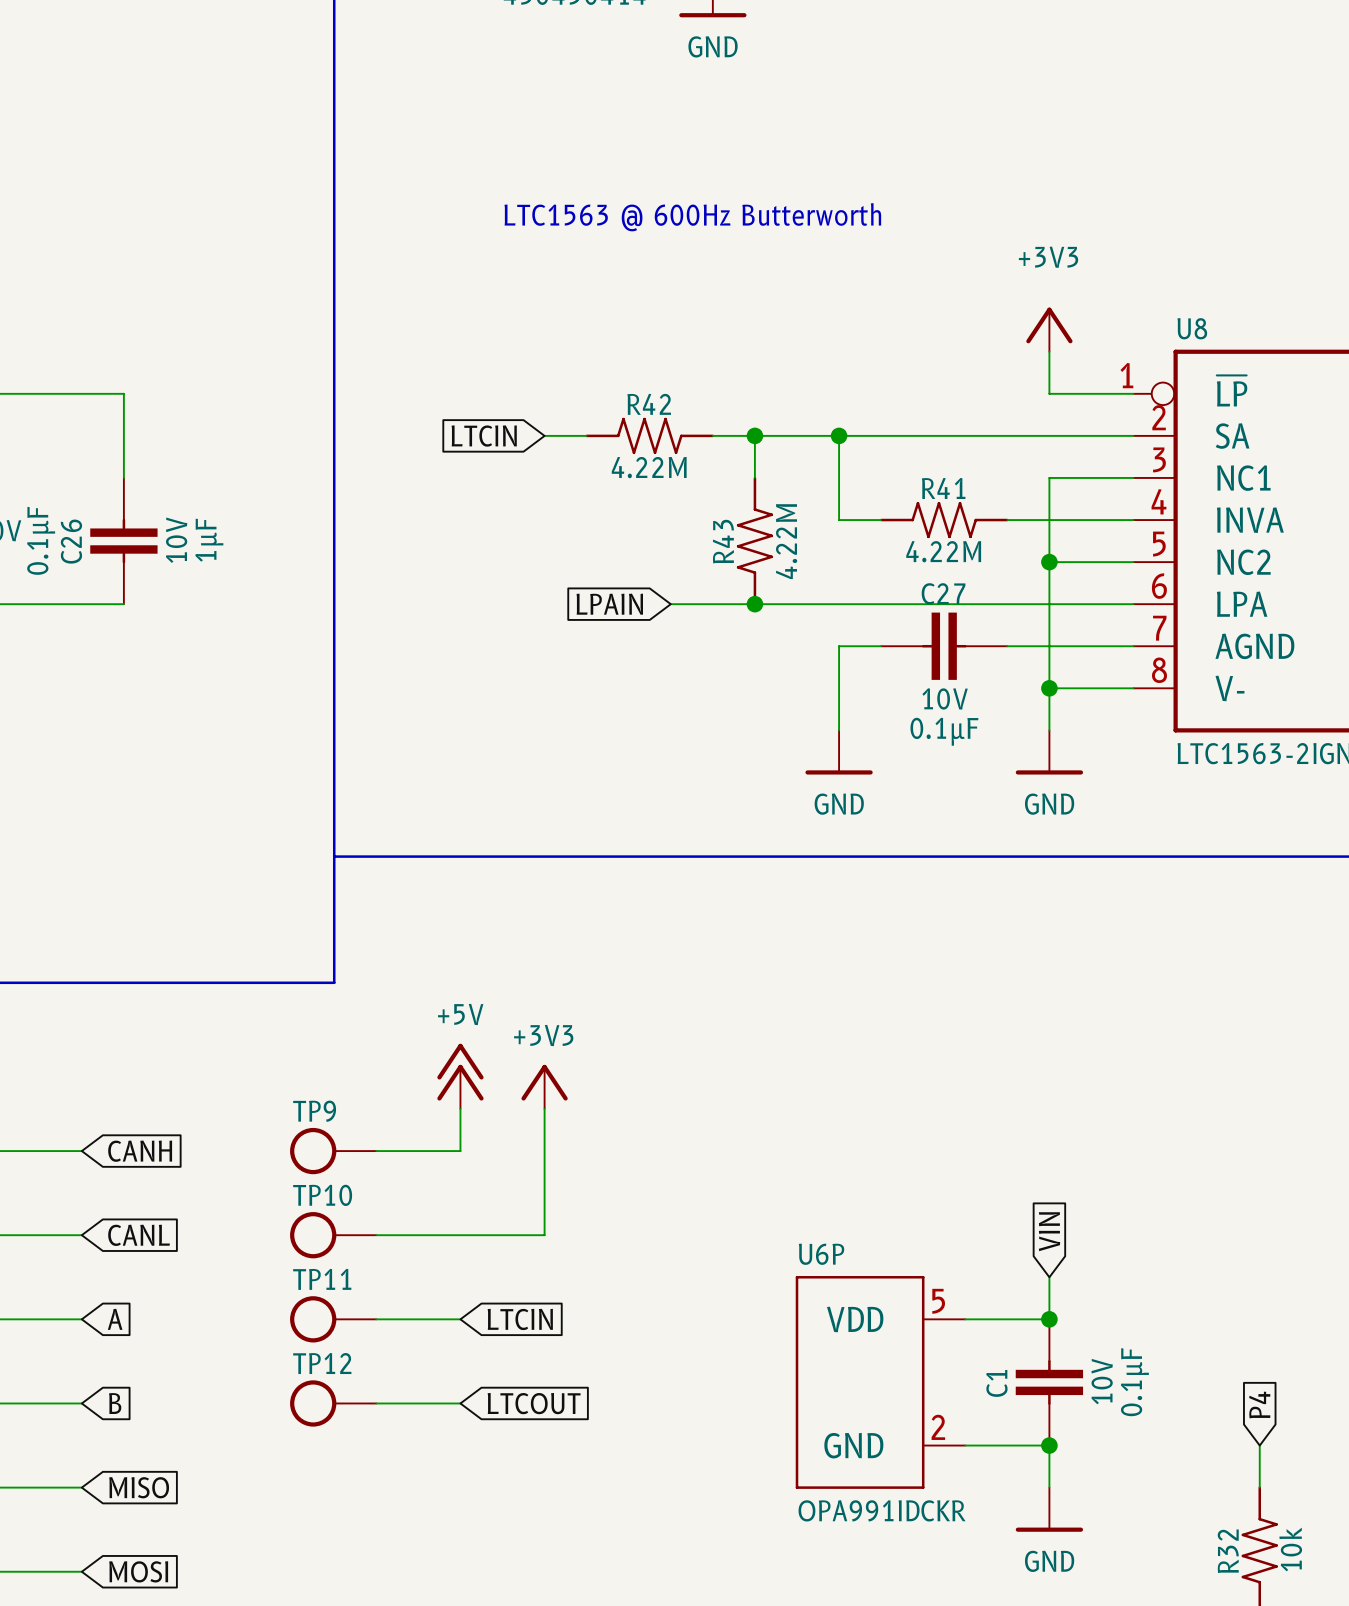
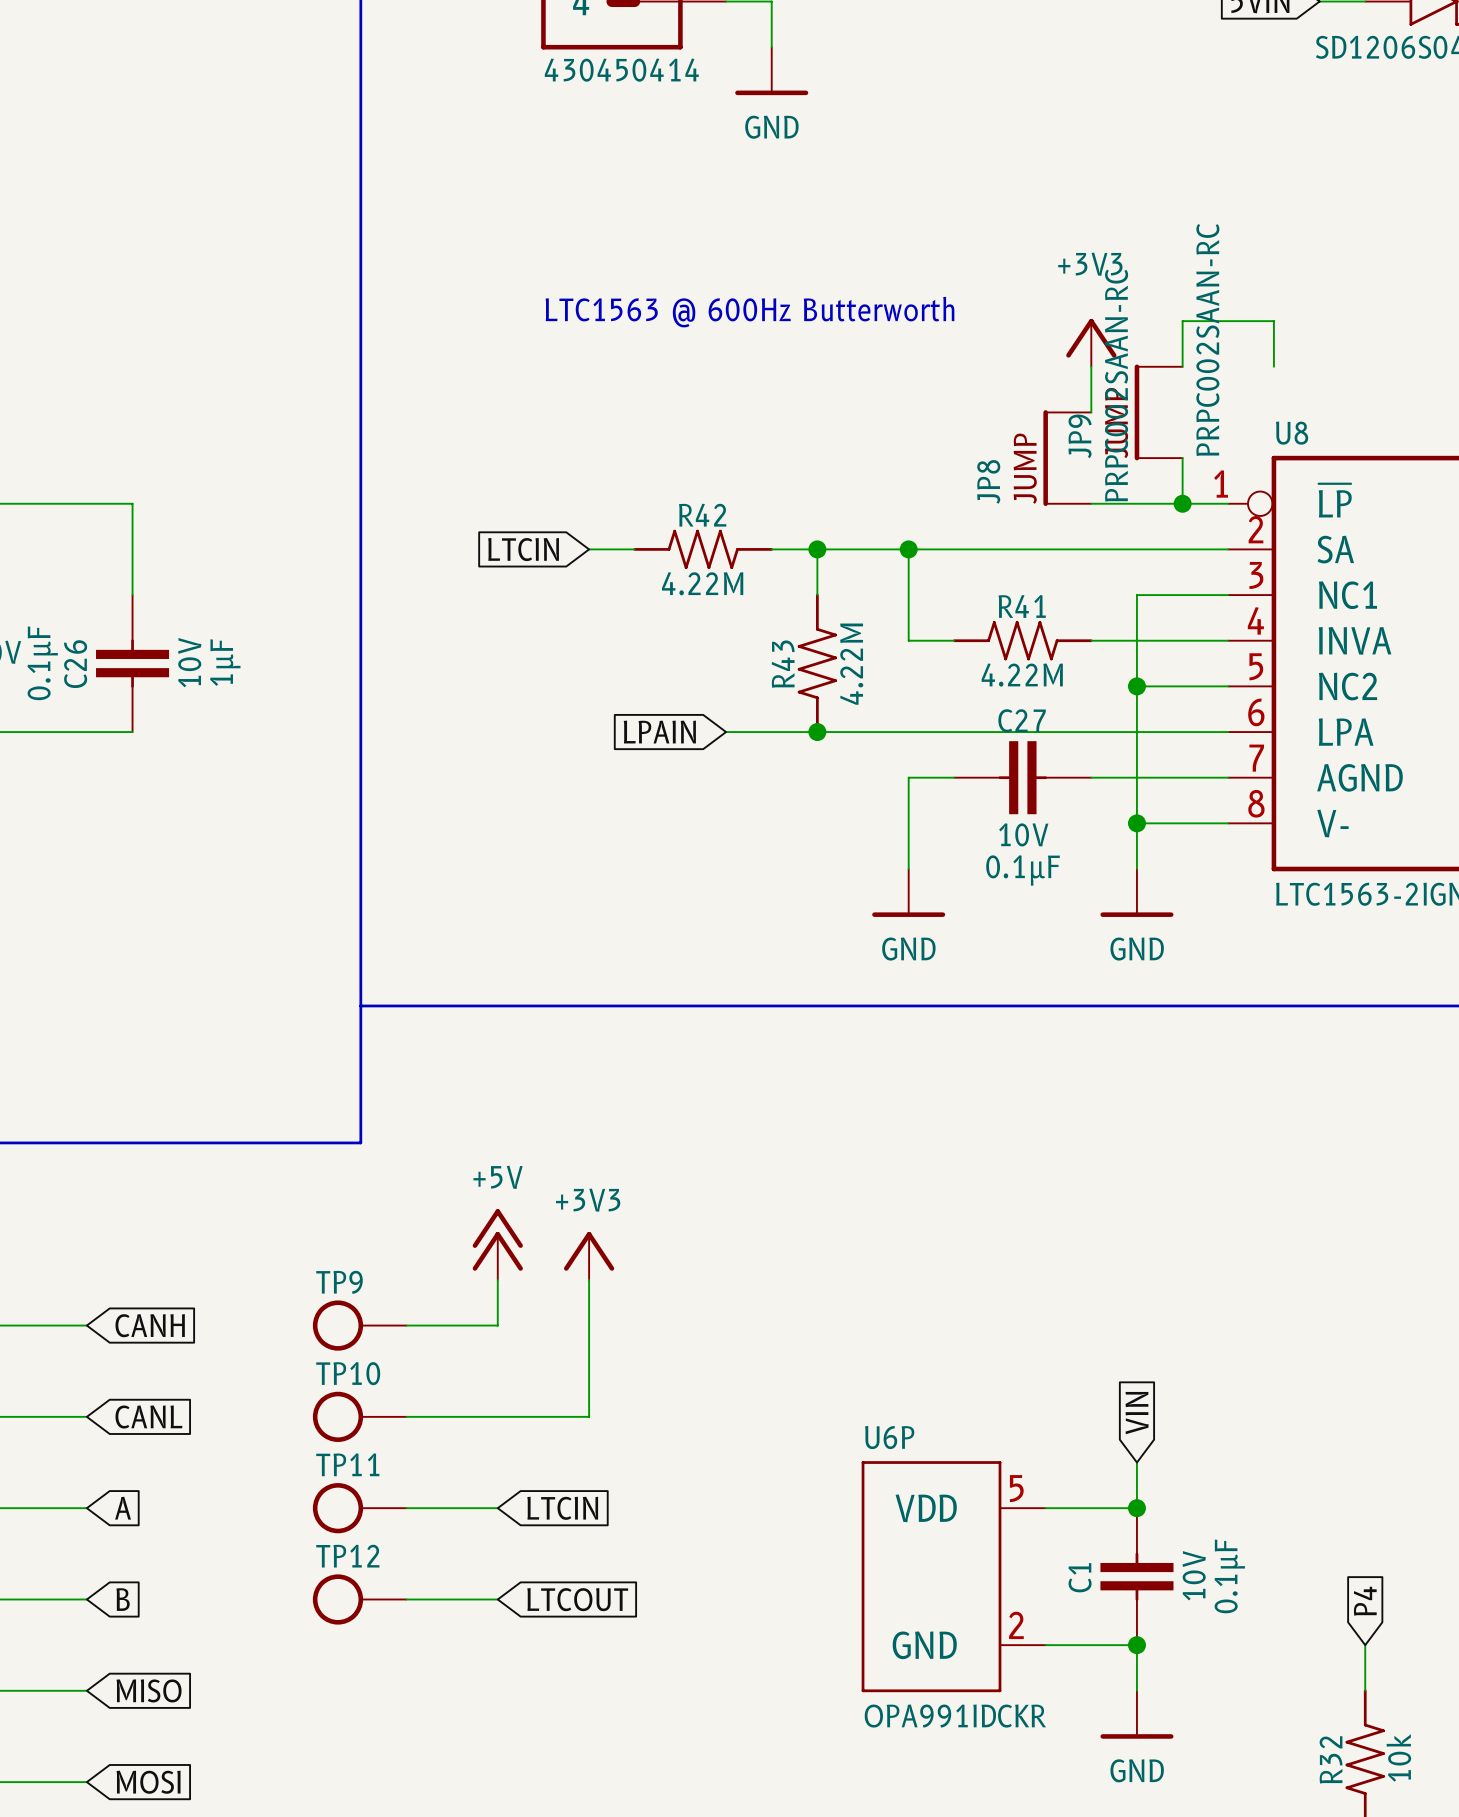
wire: none -> (1091, 366) (1091, 412)
wire: none -> (1182, 366) (1182, 321) (1273, 321) (1273, 366)
JP9: none -> (1158, 412)
power symbol position: +3V3 (1049, 329) -> +3V3 (1091, 342)
JP8: none -> (1067, 458)
wire: (1049, 351) (1049, 393) -> (1091, 503) (1136, 503)
wire: none -> (1182, 458) (1182, 503)
junction: none -> (1182, 503)

